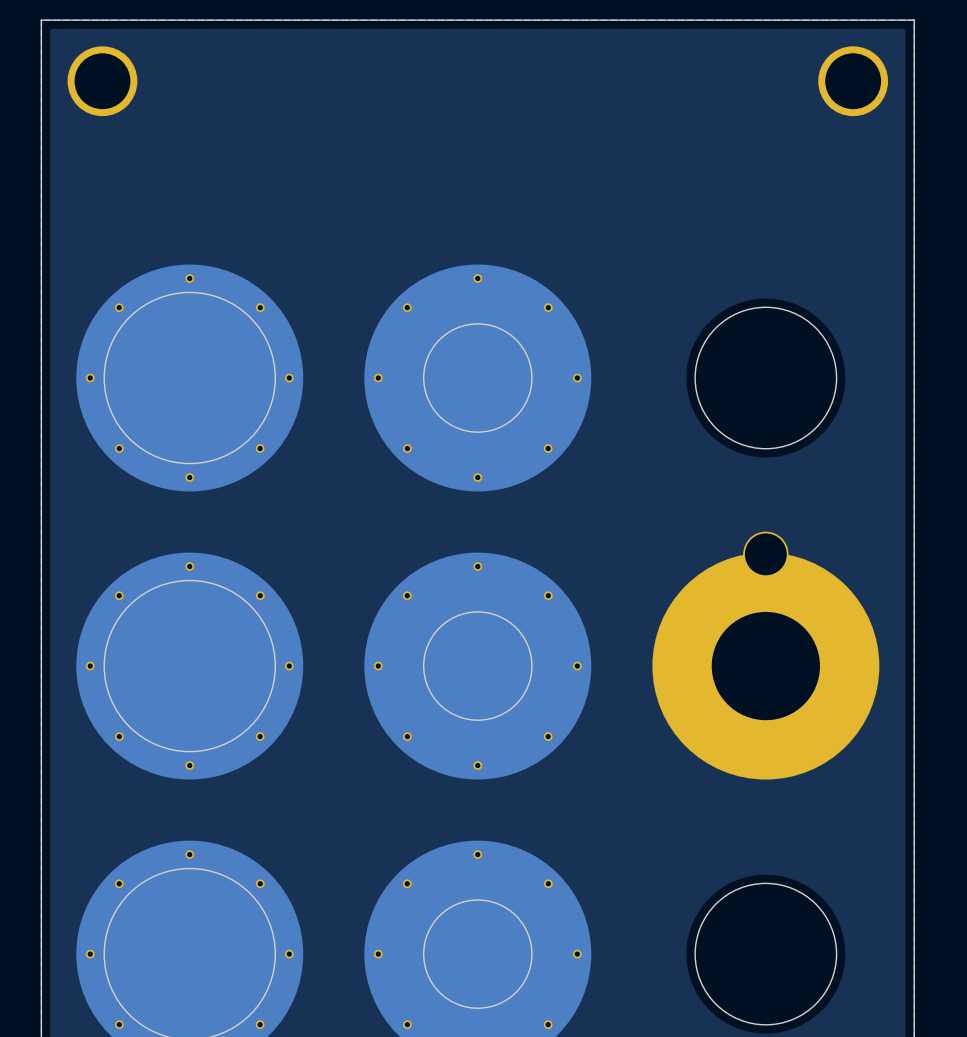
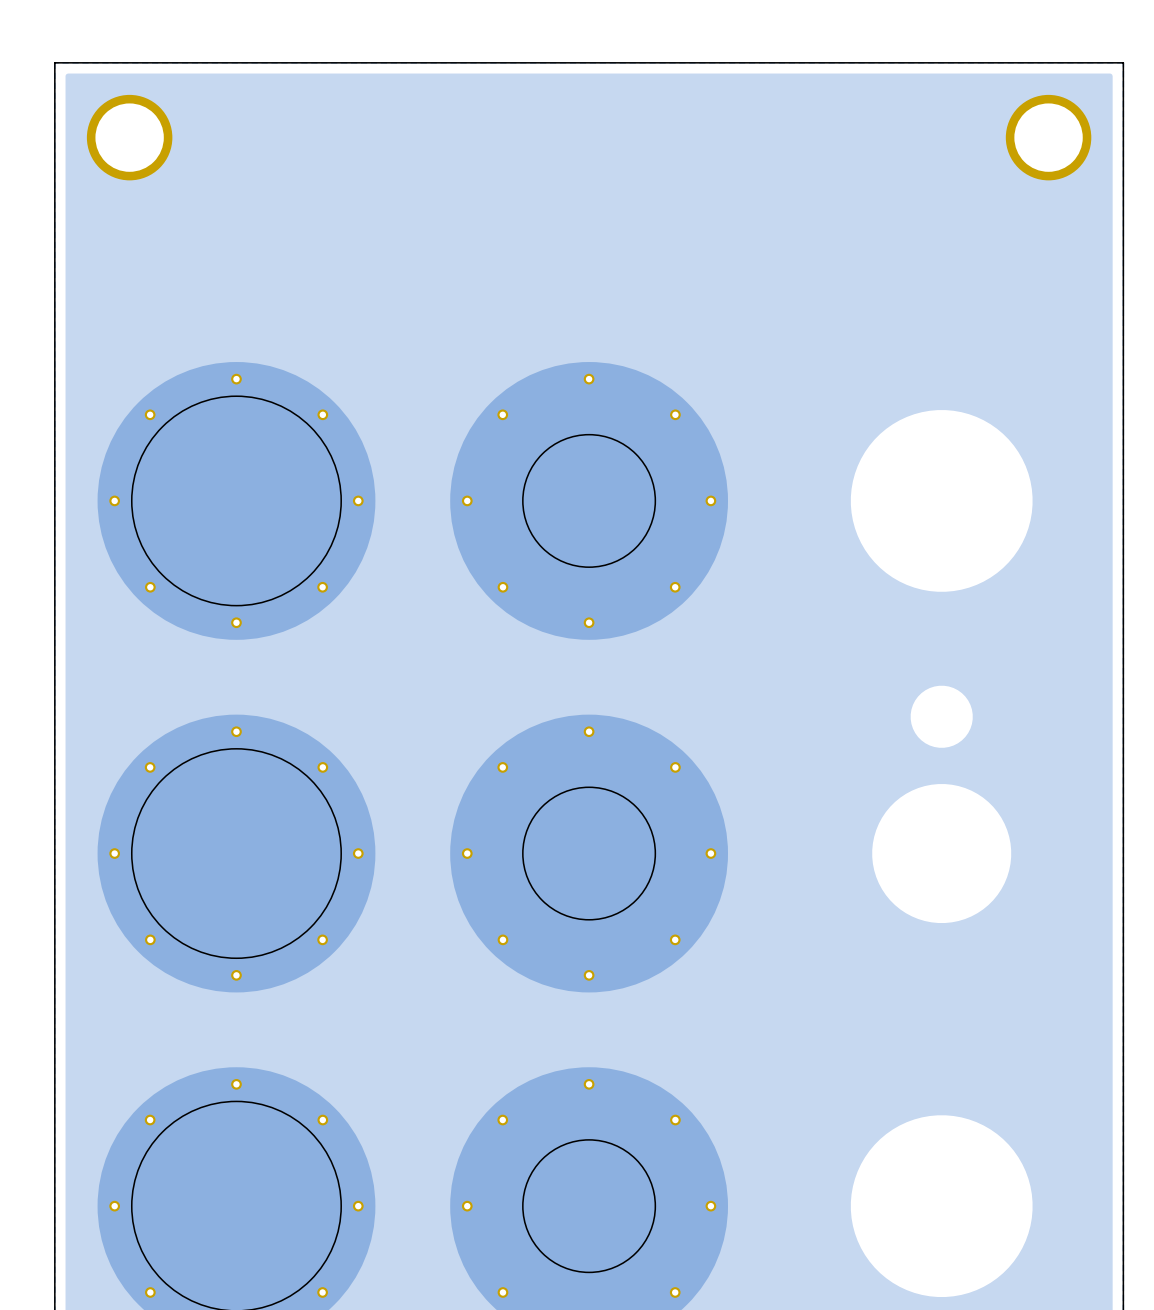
drawing: [694, 306, 838, 450] -> none
part: (765, 655) -> none
drawing: [694, 882, 838, 1026] -> none

